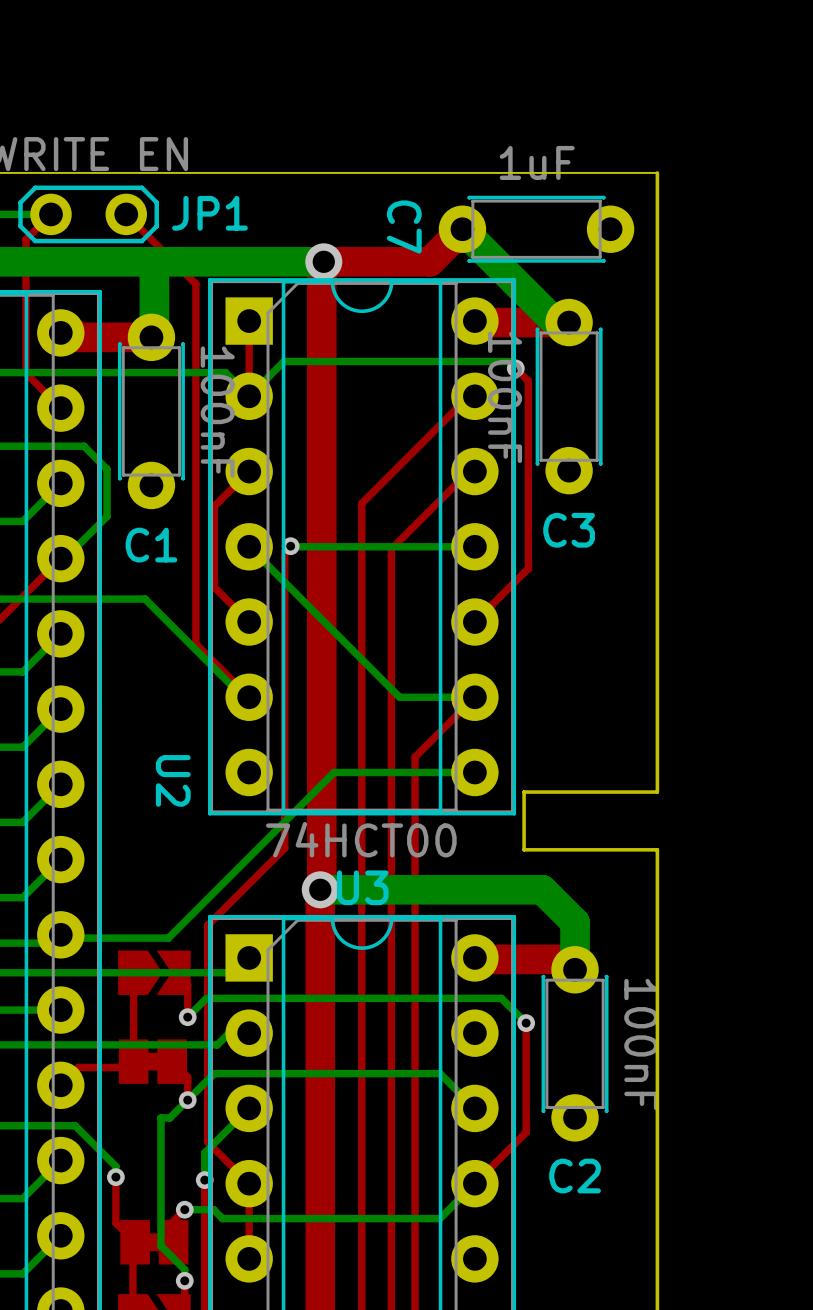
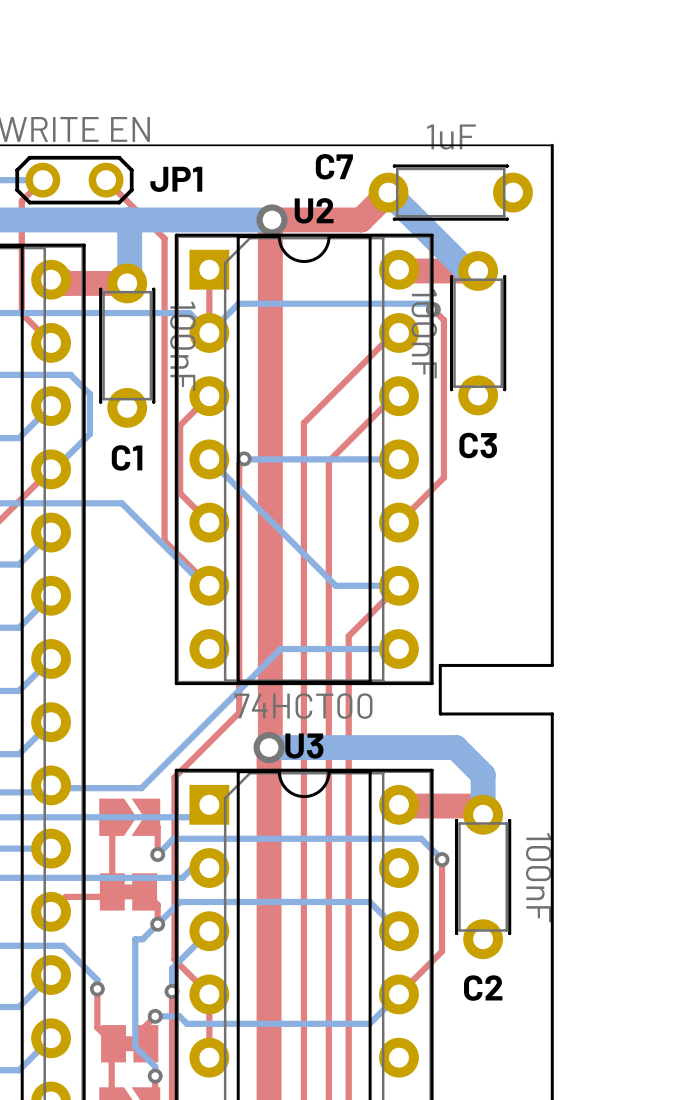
C7 name rotation: 0° (404, 226) -> 90° counterclockwise (334, 166)
U2 name rotation: 0° (173, 780) -> 90° counterclockwise (314, 210)
U2 name position: U2 (173, 780) -> U2 (314, 210)

